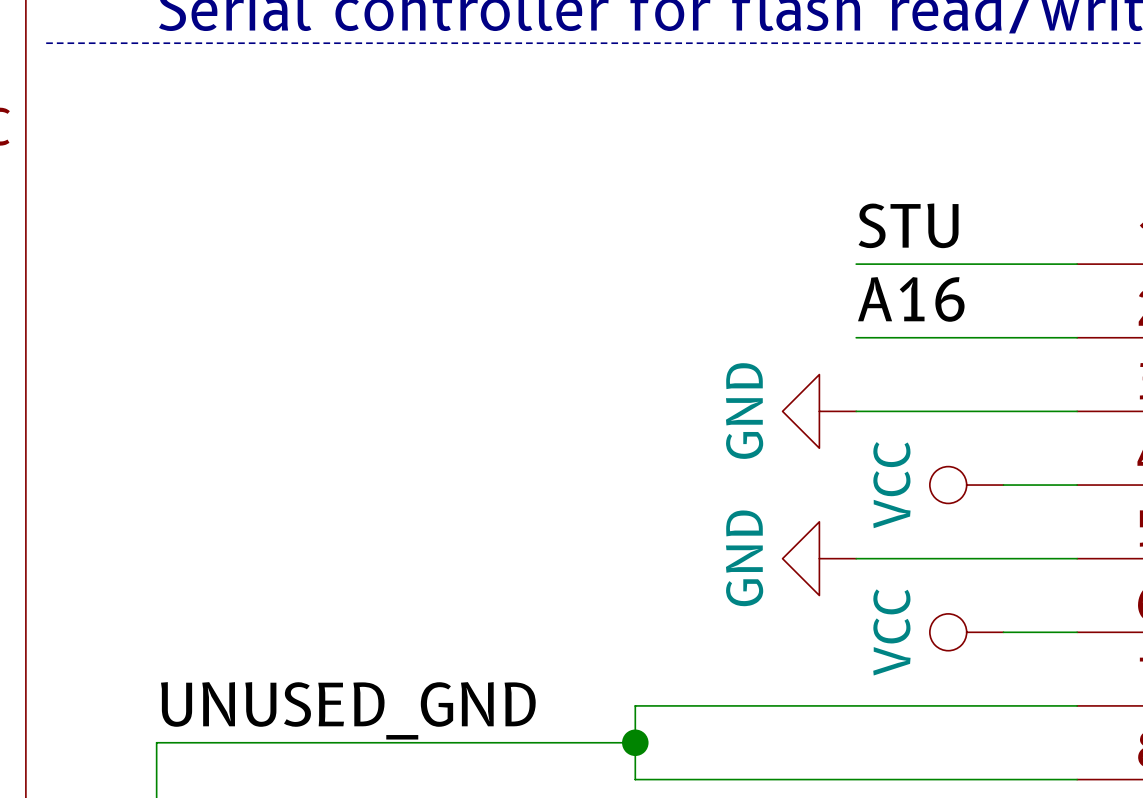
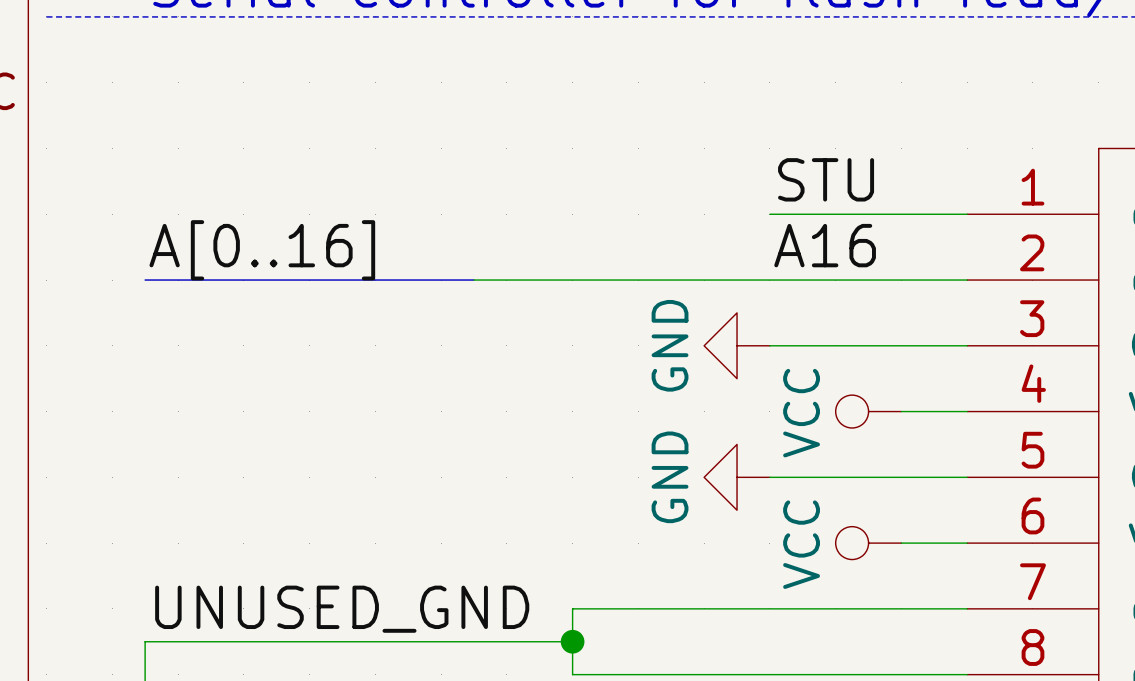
label: none -> A[0..16] (262, 250)
bus: none -> (145, 280) (473, 280)
wire: none -> (473, 280) (769, 280)

